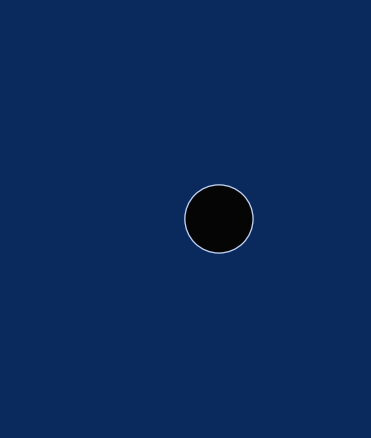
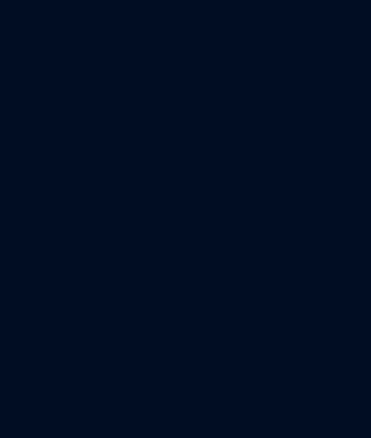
part: (218, 218) -> none

